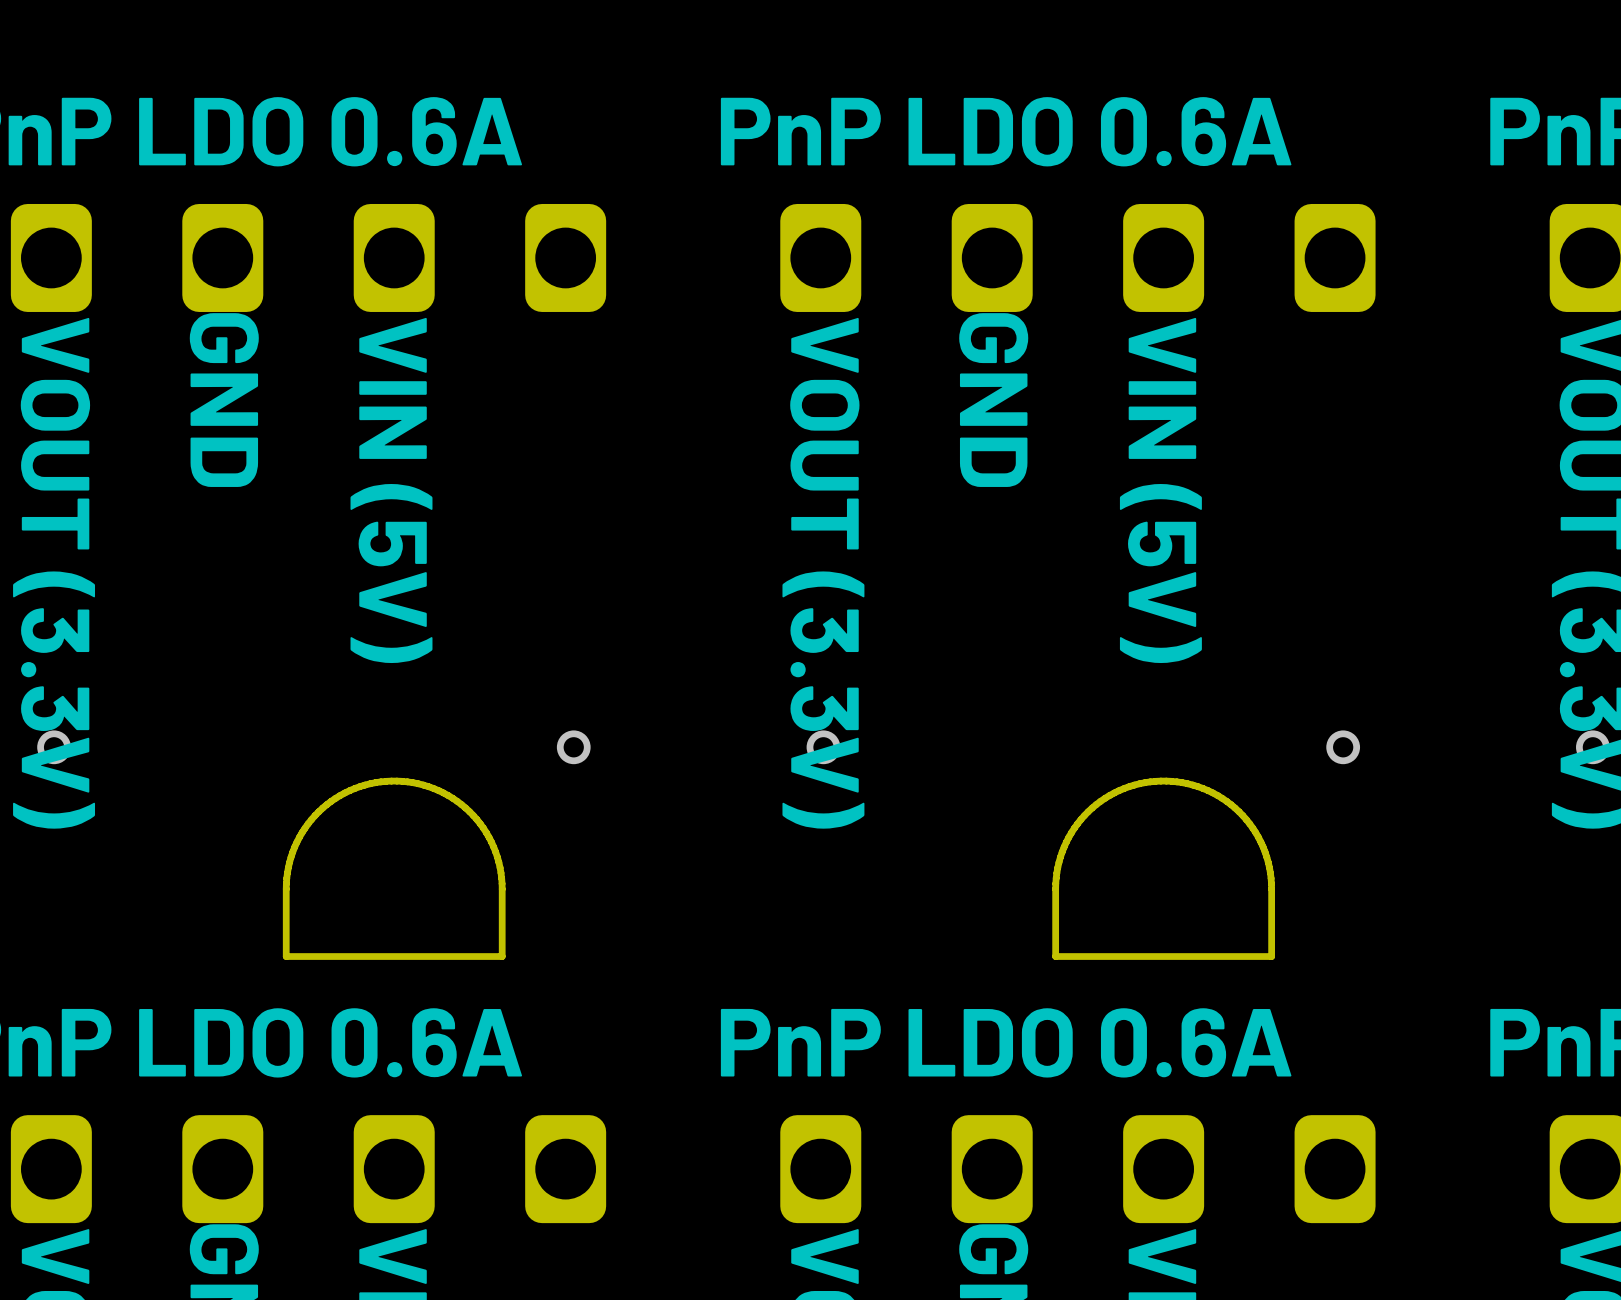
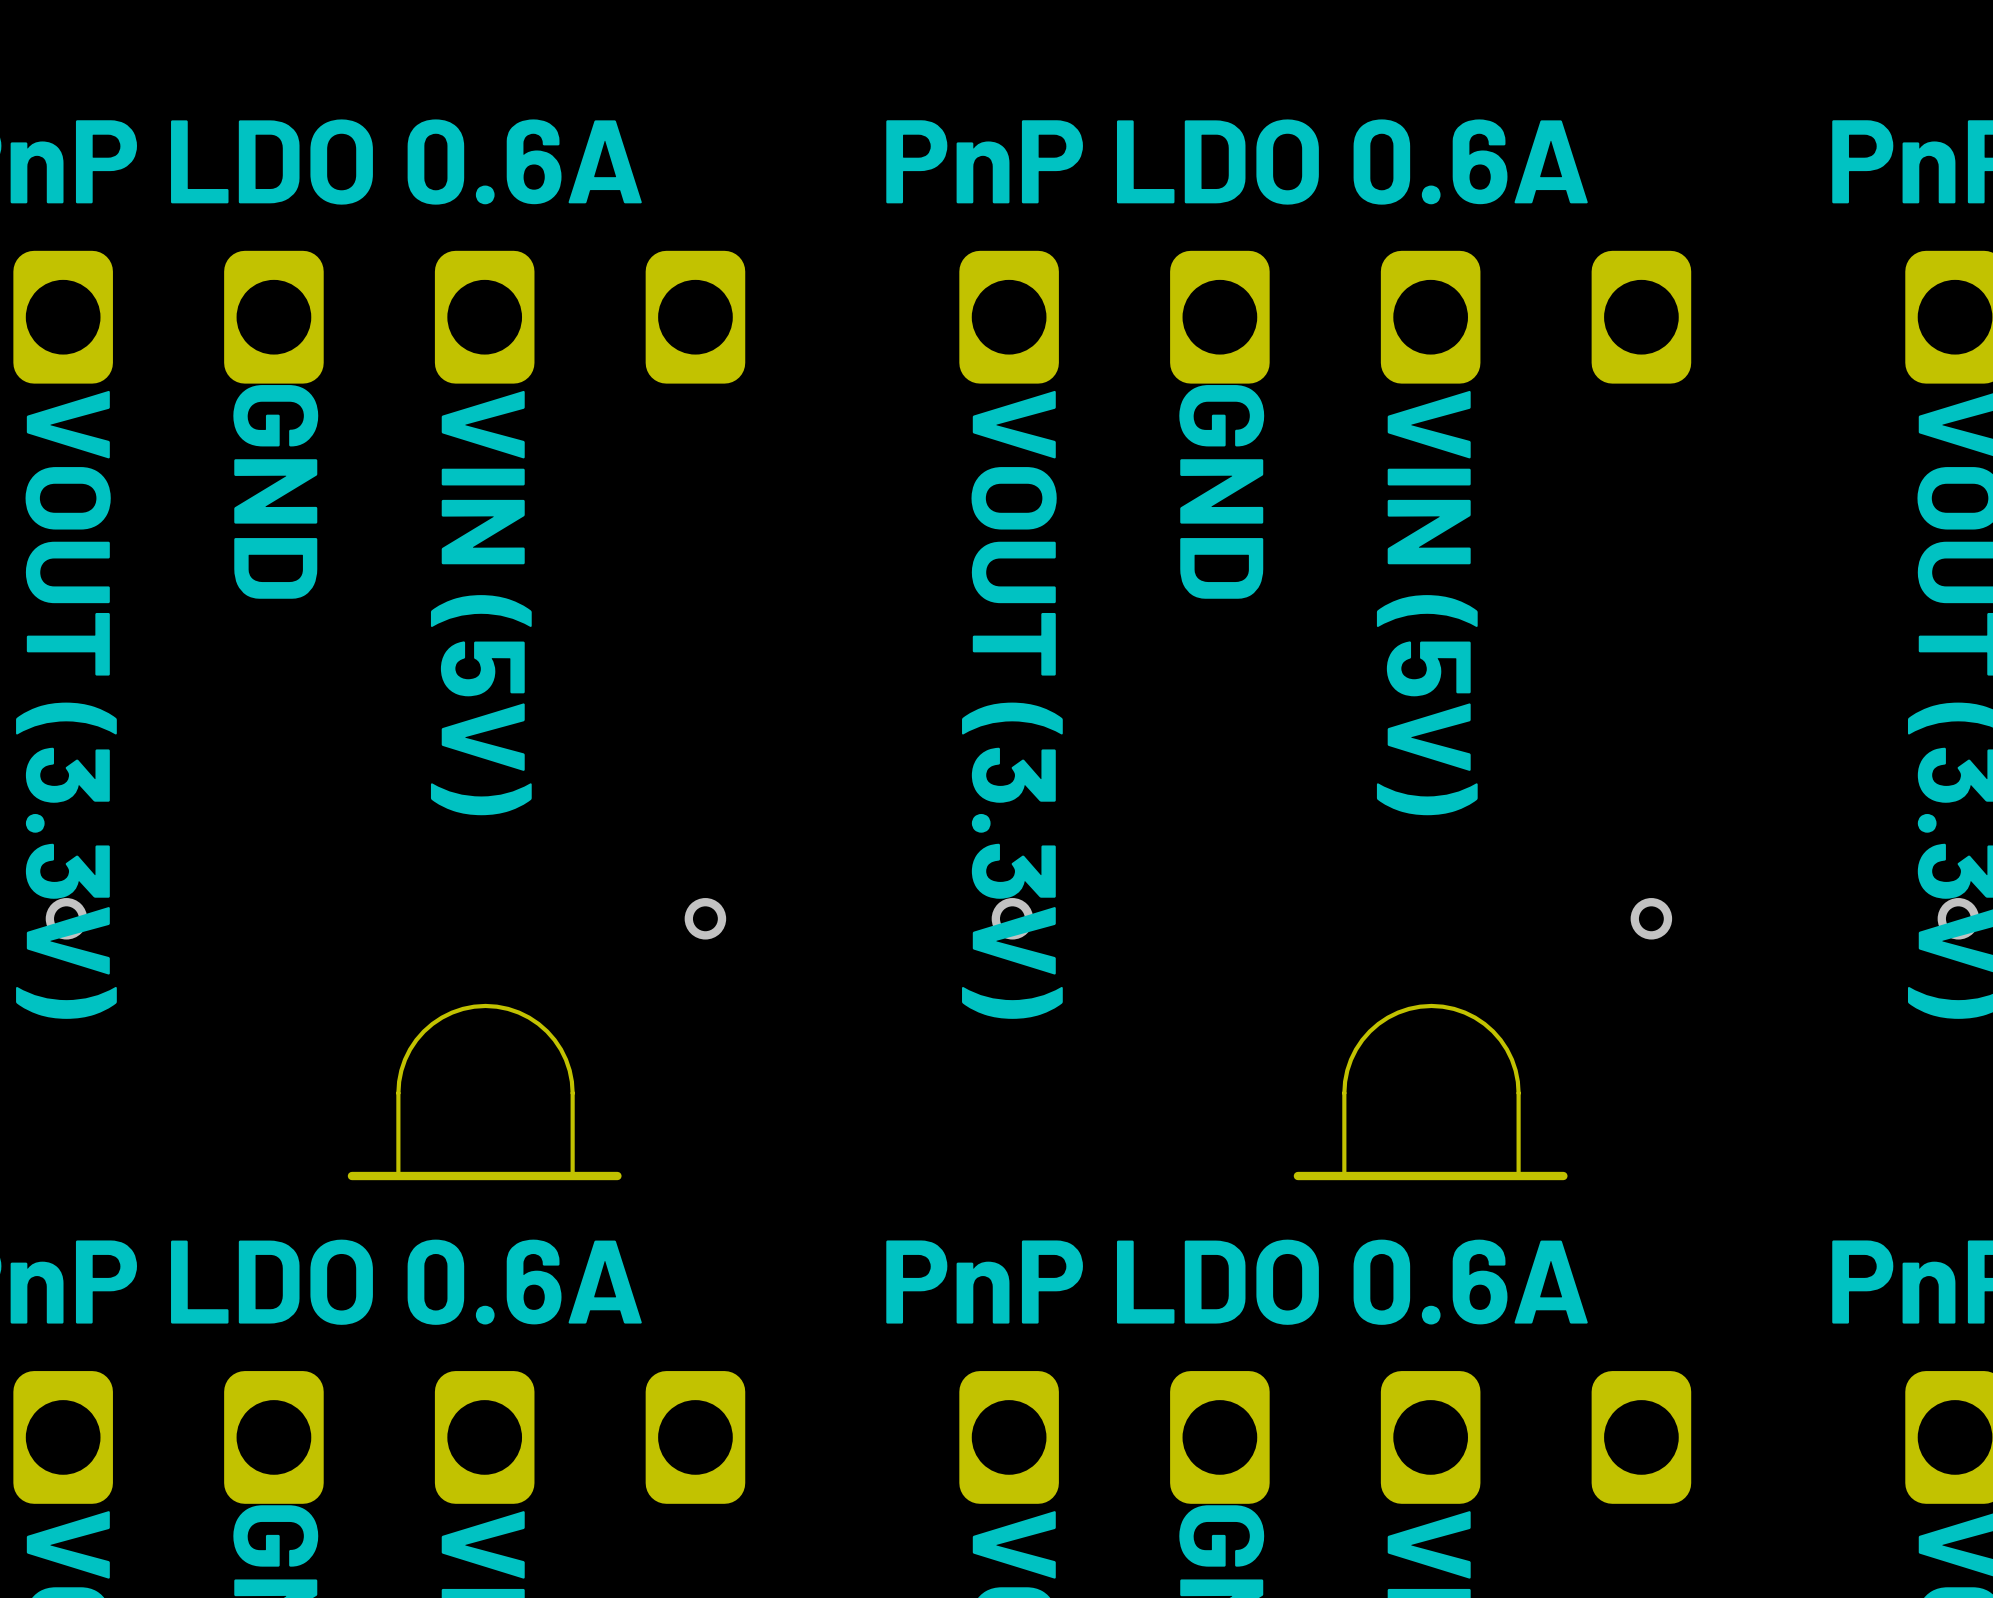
board edge: none -> (572, 1176) (571, 1081) (560, 1049) (547, 1031) (529, 1017) (508, 1008) (485, 1005) (462, 1008) (441, 1017) (423, 1031) (410, 1049) (399, 1081) (398, 1176)
board edge: (502, 956) (501, 872) (495, 852) (486, 832) (469, 811) (448, 795) (423, 785) (396, 781) (370, 783) (340, 795) (318, 811) (302, 832) (292, 852) (287, 872) (286, 956) -> none
board edge: none -> (1518, 1176) (1517, 1081) (1506, 1049) (1493, 1031) (1475, 1017) (1454, 1008) (1431, 1005) (1408, 1008) (1387, 1017) (1369, 1031) (1356, 1049) (1345, 1081) (1344, 1176)
board edge: (1271, 956) (1270, 872) (1265, 852) (1255, 832) (1239, 811) (1217, 795) (1192, 785) (1166, 781) (1139, 783) (1109, 795) (1088, 811) (1071, 832) (1062, 852) (1056, 872) (1055, 956) -> none

